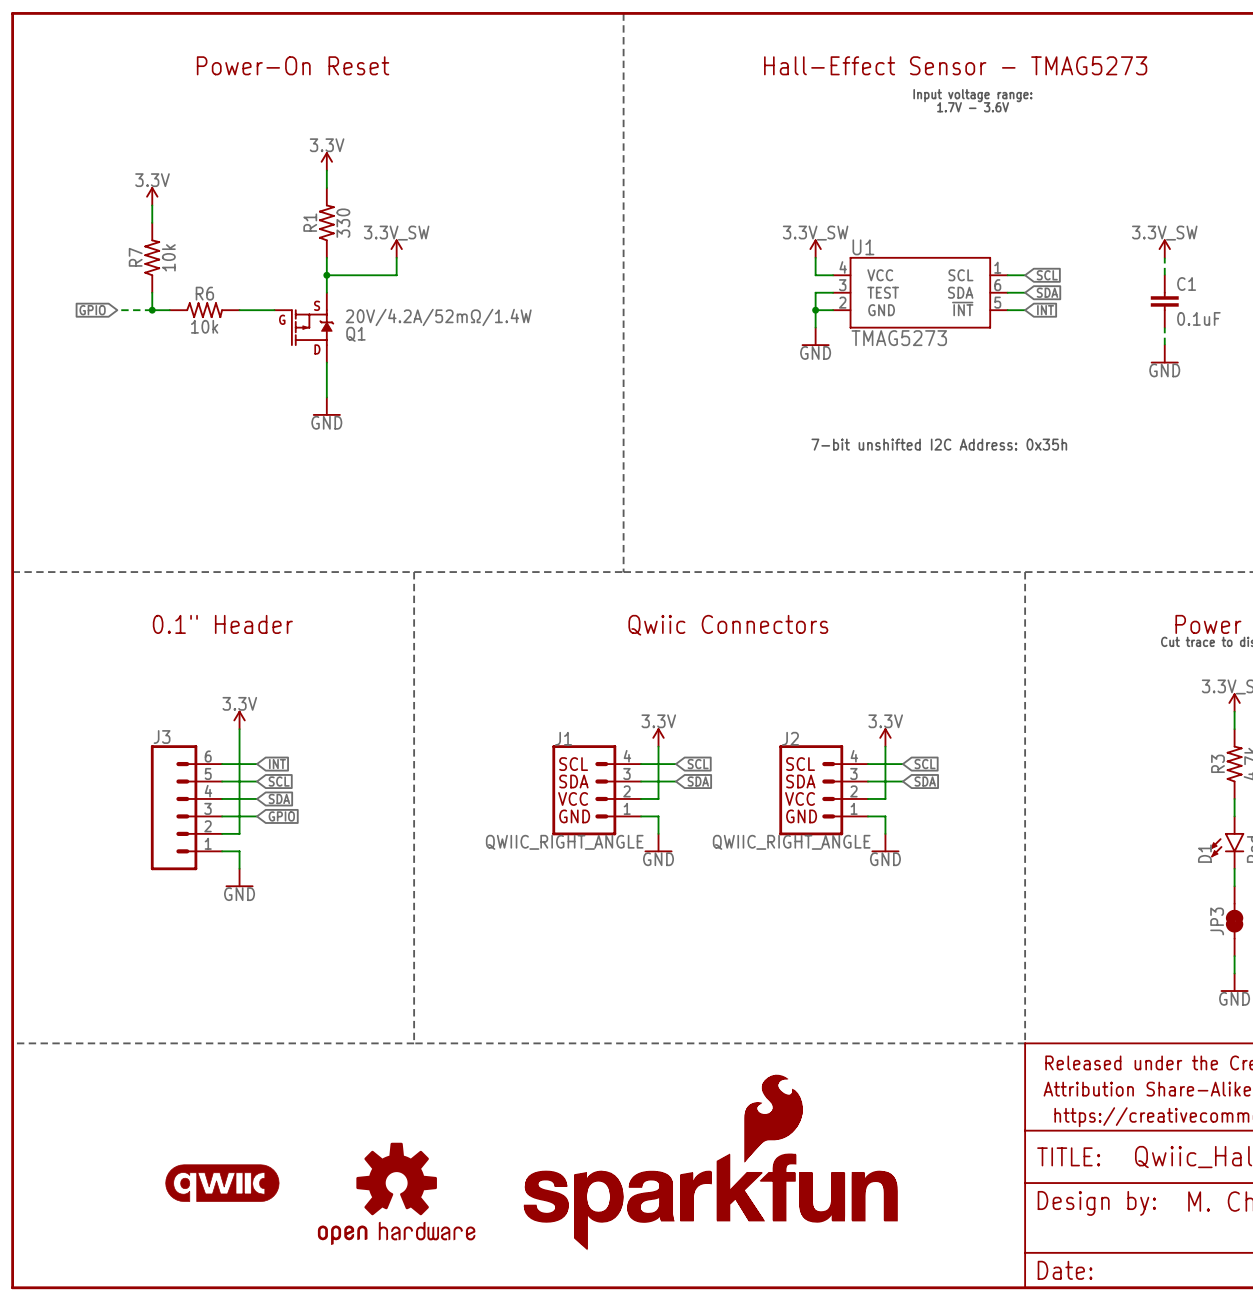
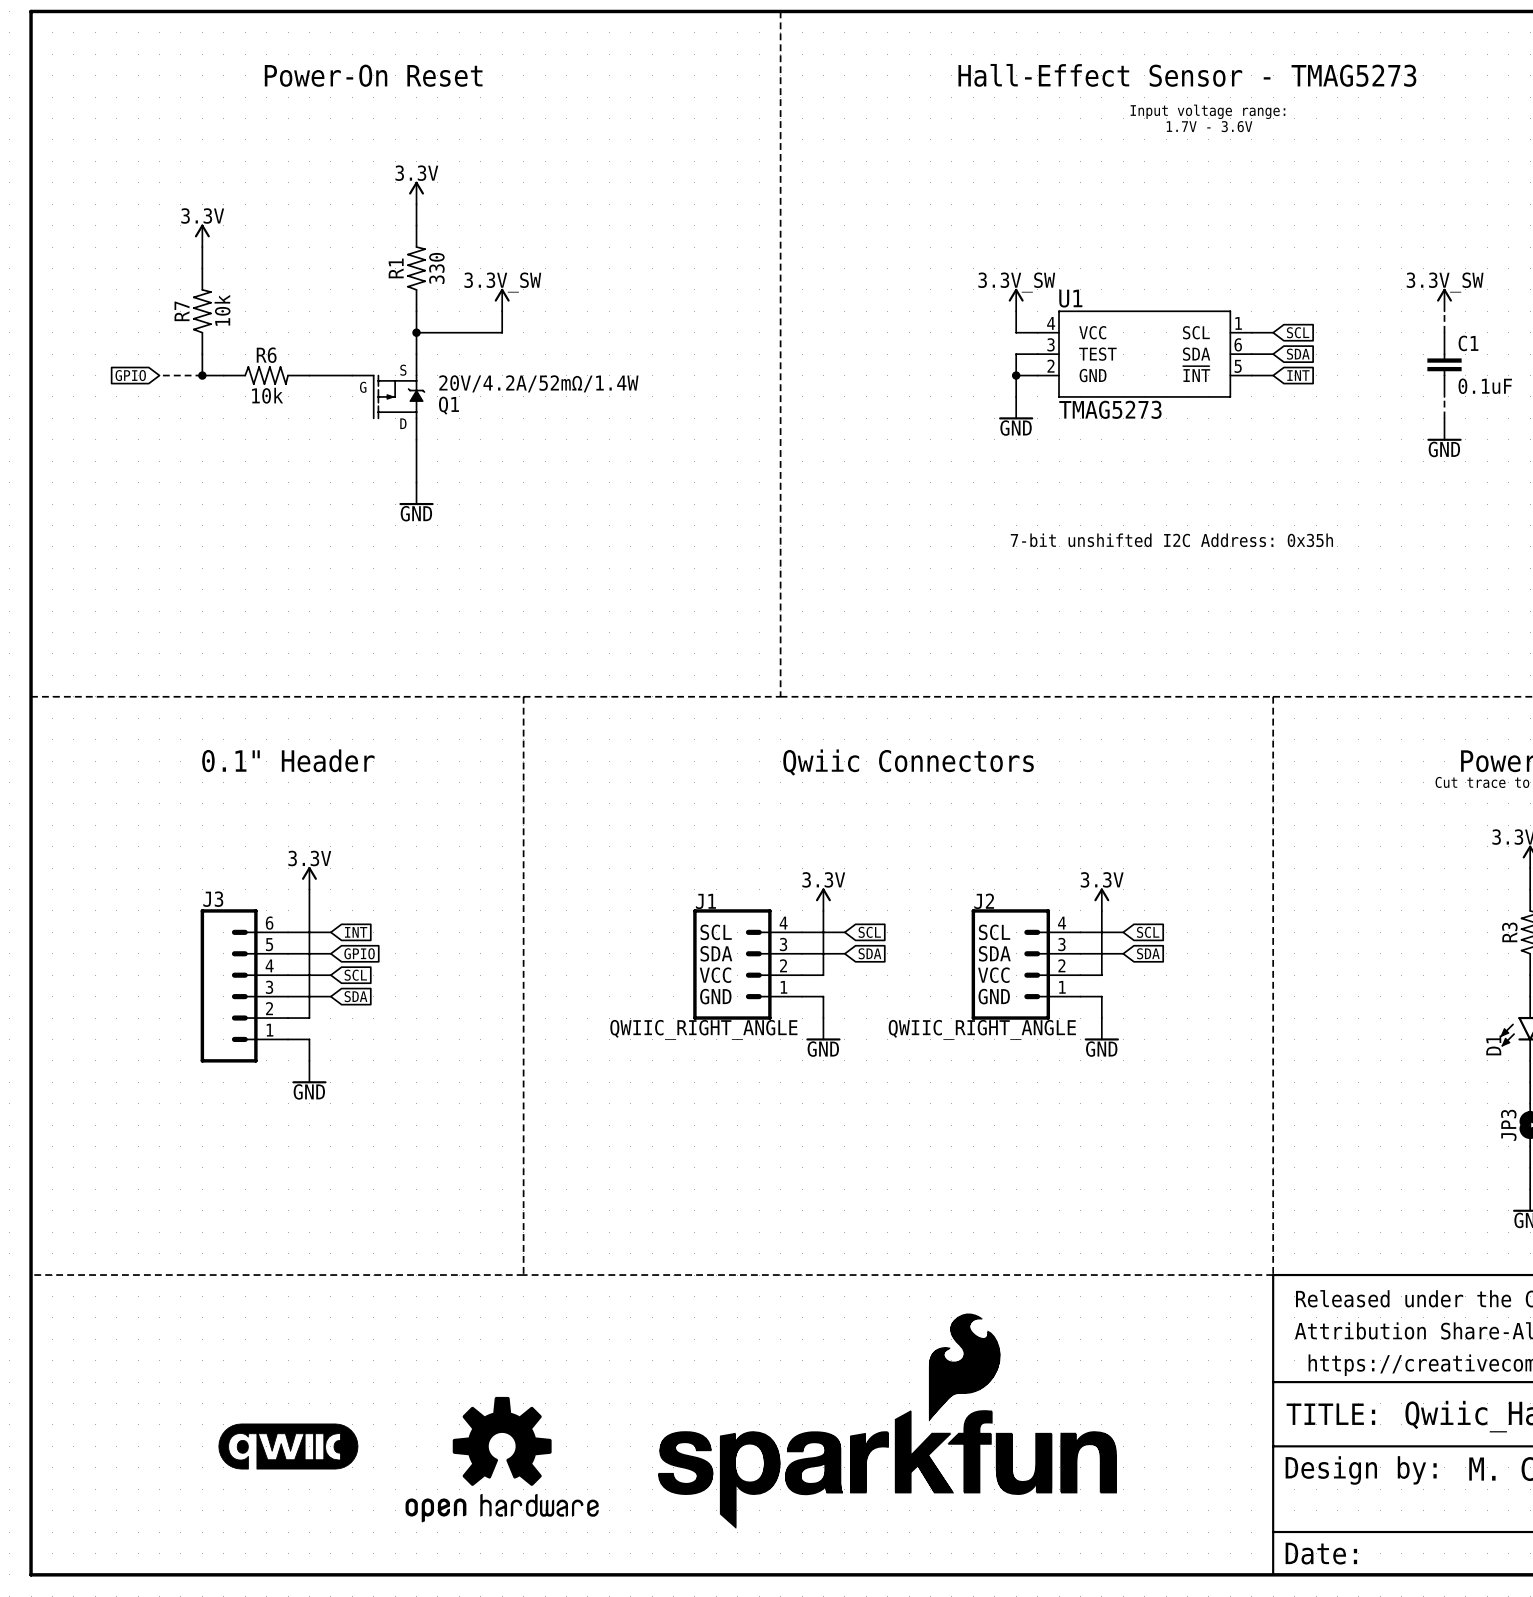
global label: SCL (279, 781) -> GPIO (359, 953)
global label: SDA (279, 798) -> SCL (355, 975)
global label: GPIO (281, 816) -> SDA (355, 996)

